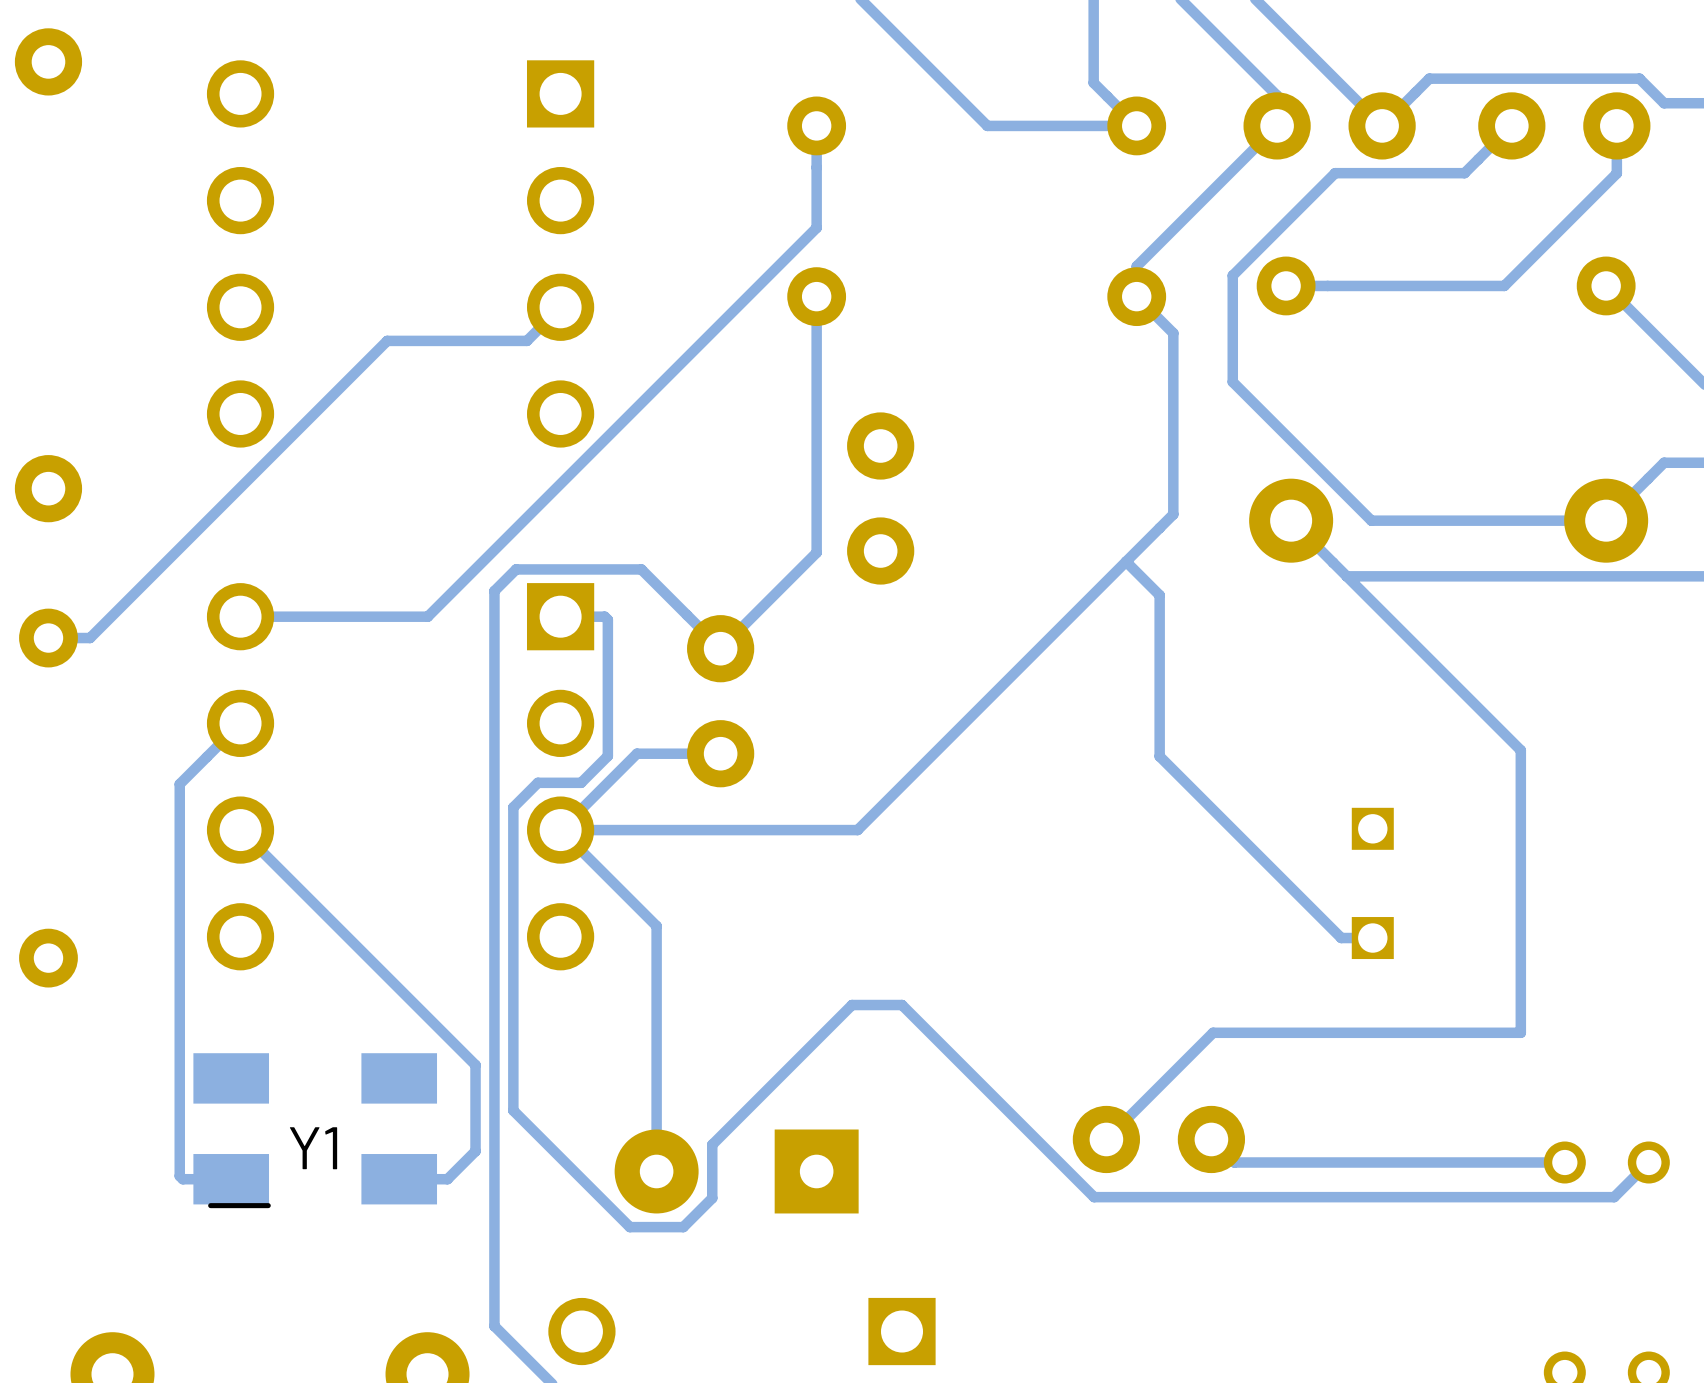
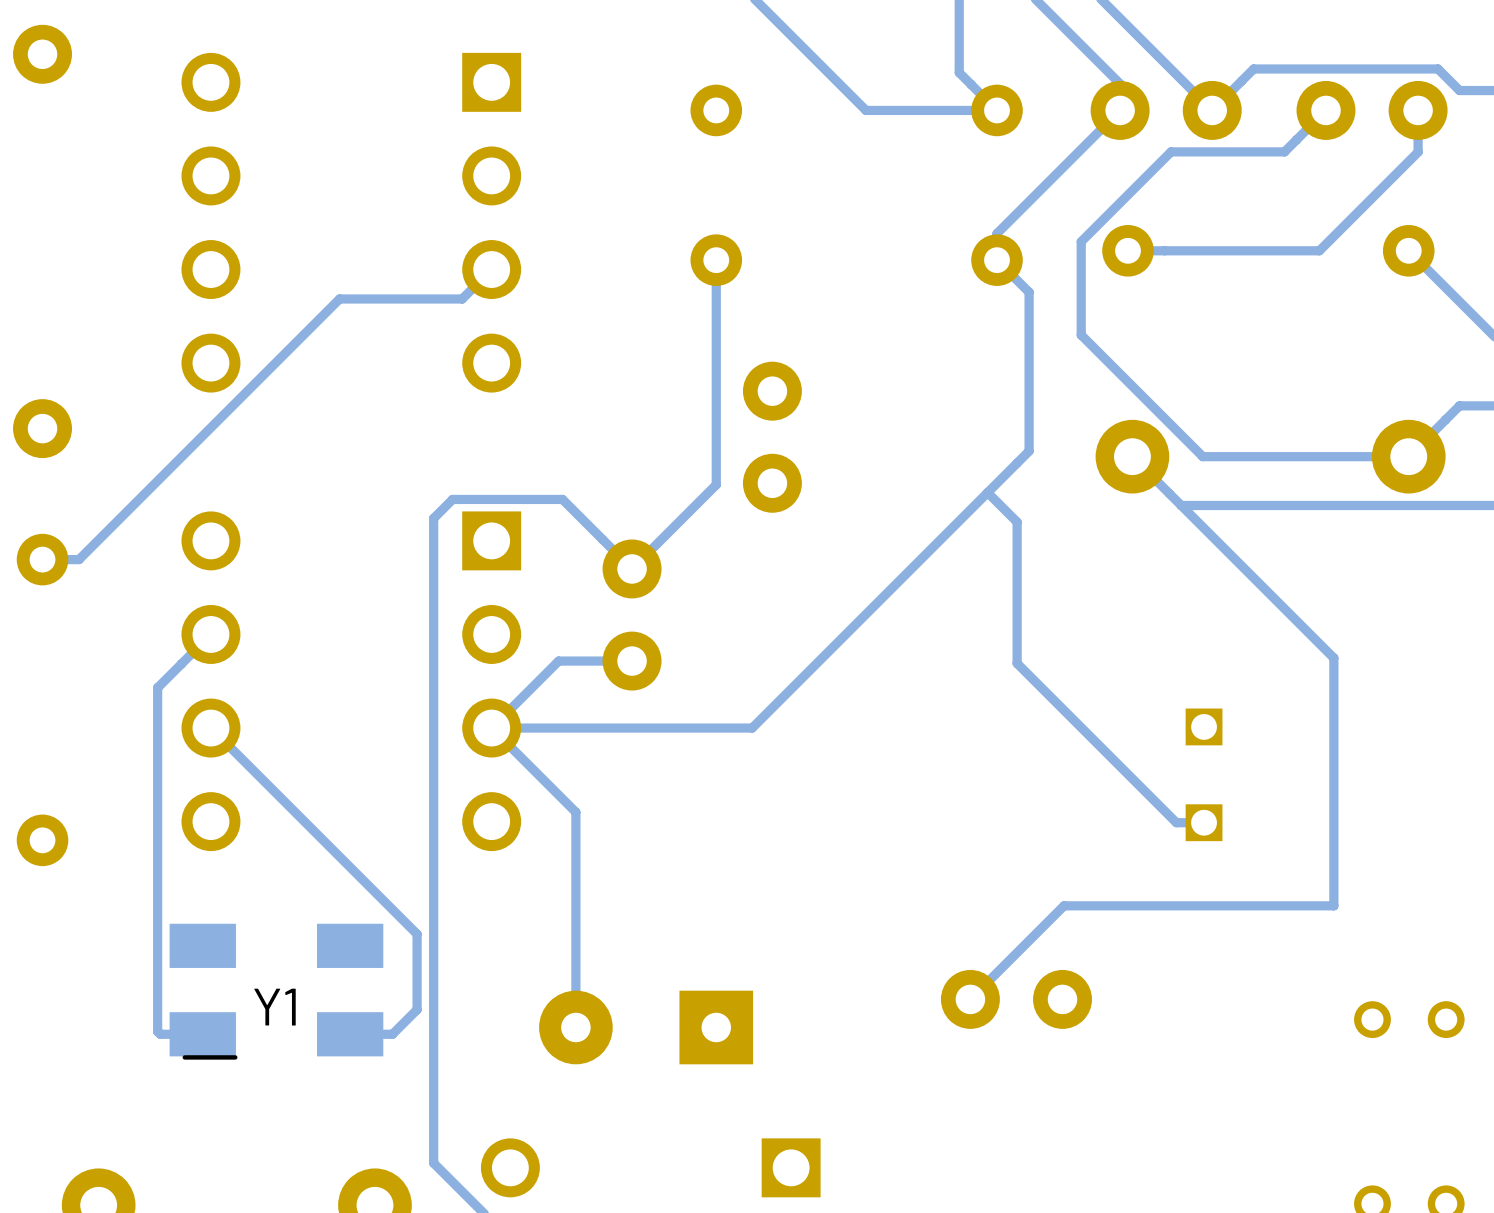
track: (816, 125) (816, 227) (427, 616) (240, 616) -> none
track: (560, 616) (604, 616) (607, 619) (607, 756) (581, 782) (537, 782) (513, 807) (513, 1110) (629, 1227) (683, 1227) (712, 1198) (712, 1144) (852, 1005) (902, 1005) (1094, 1197) (1614, 1197) (1648, 1162) -> none
track: (1211, 1139) (1234, 1162) (1564, 1162) -> none

